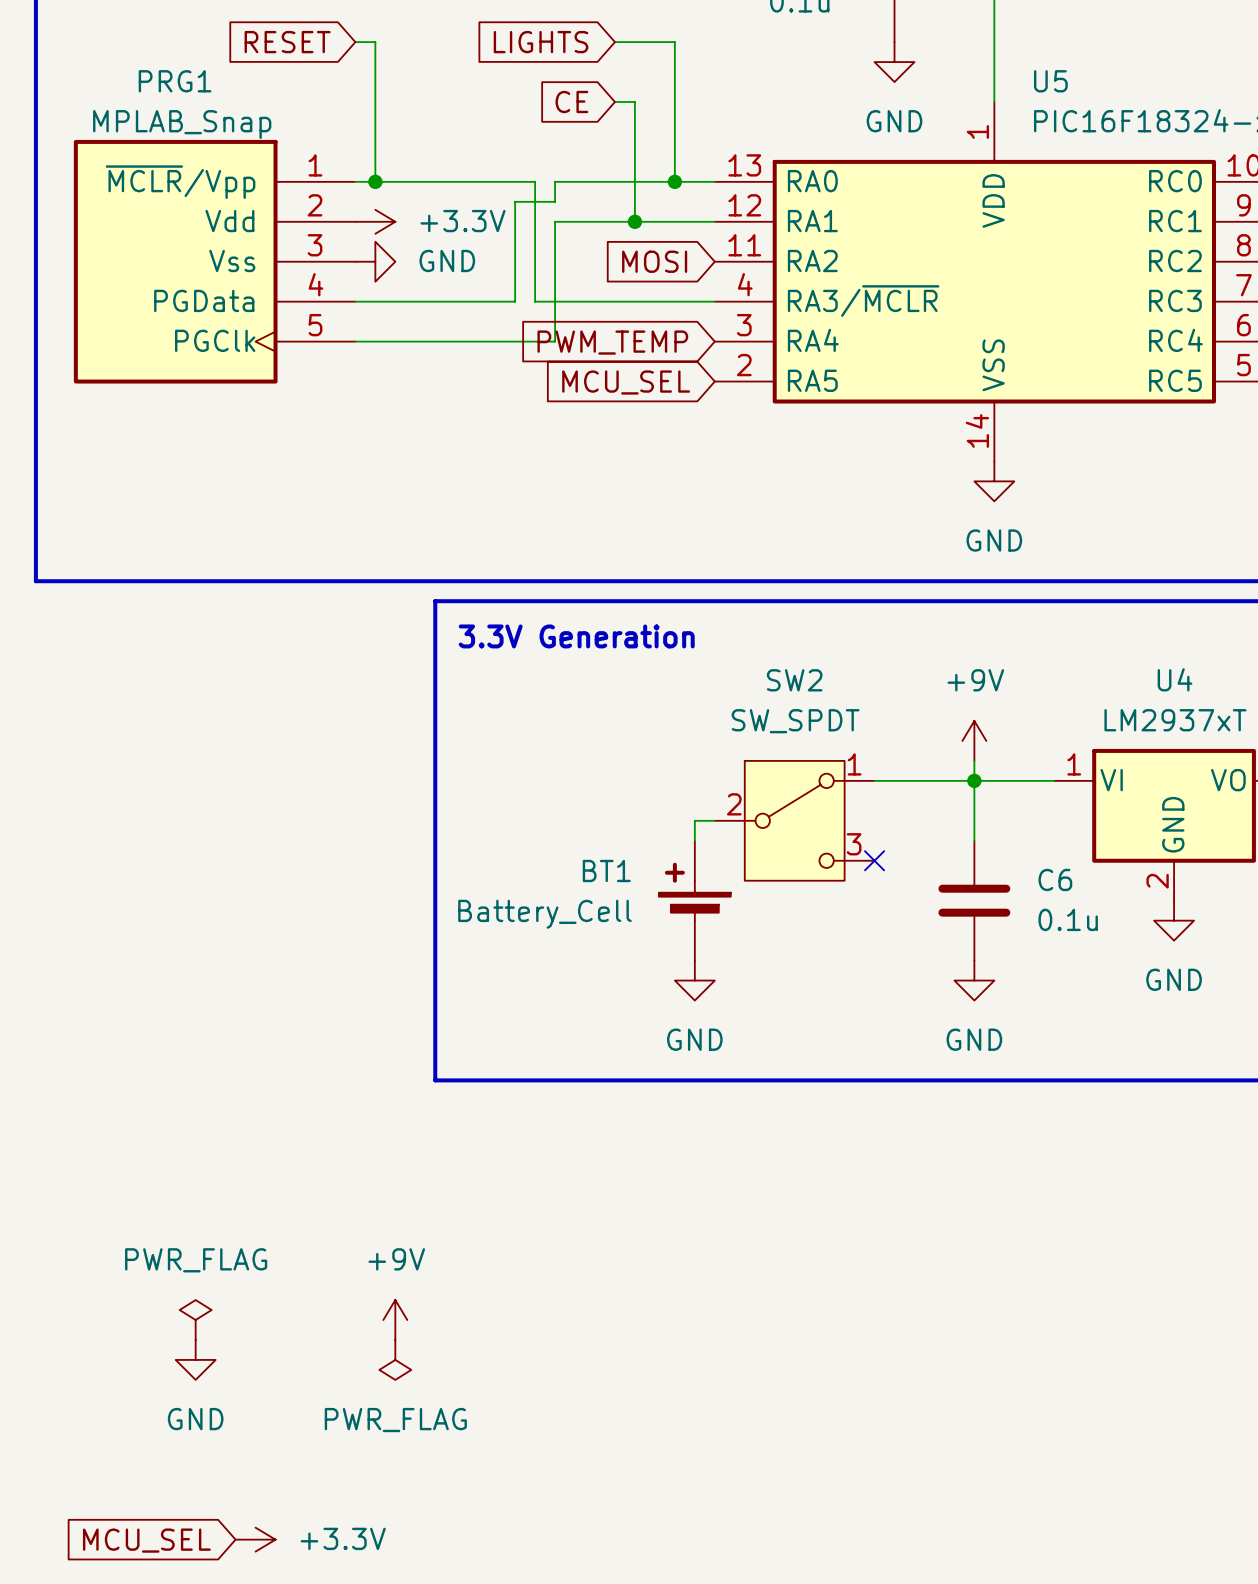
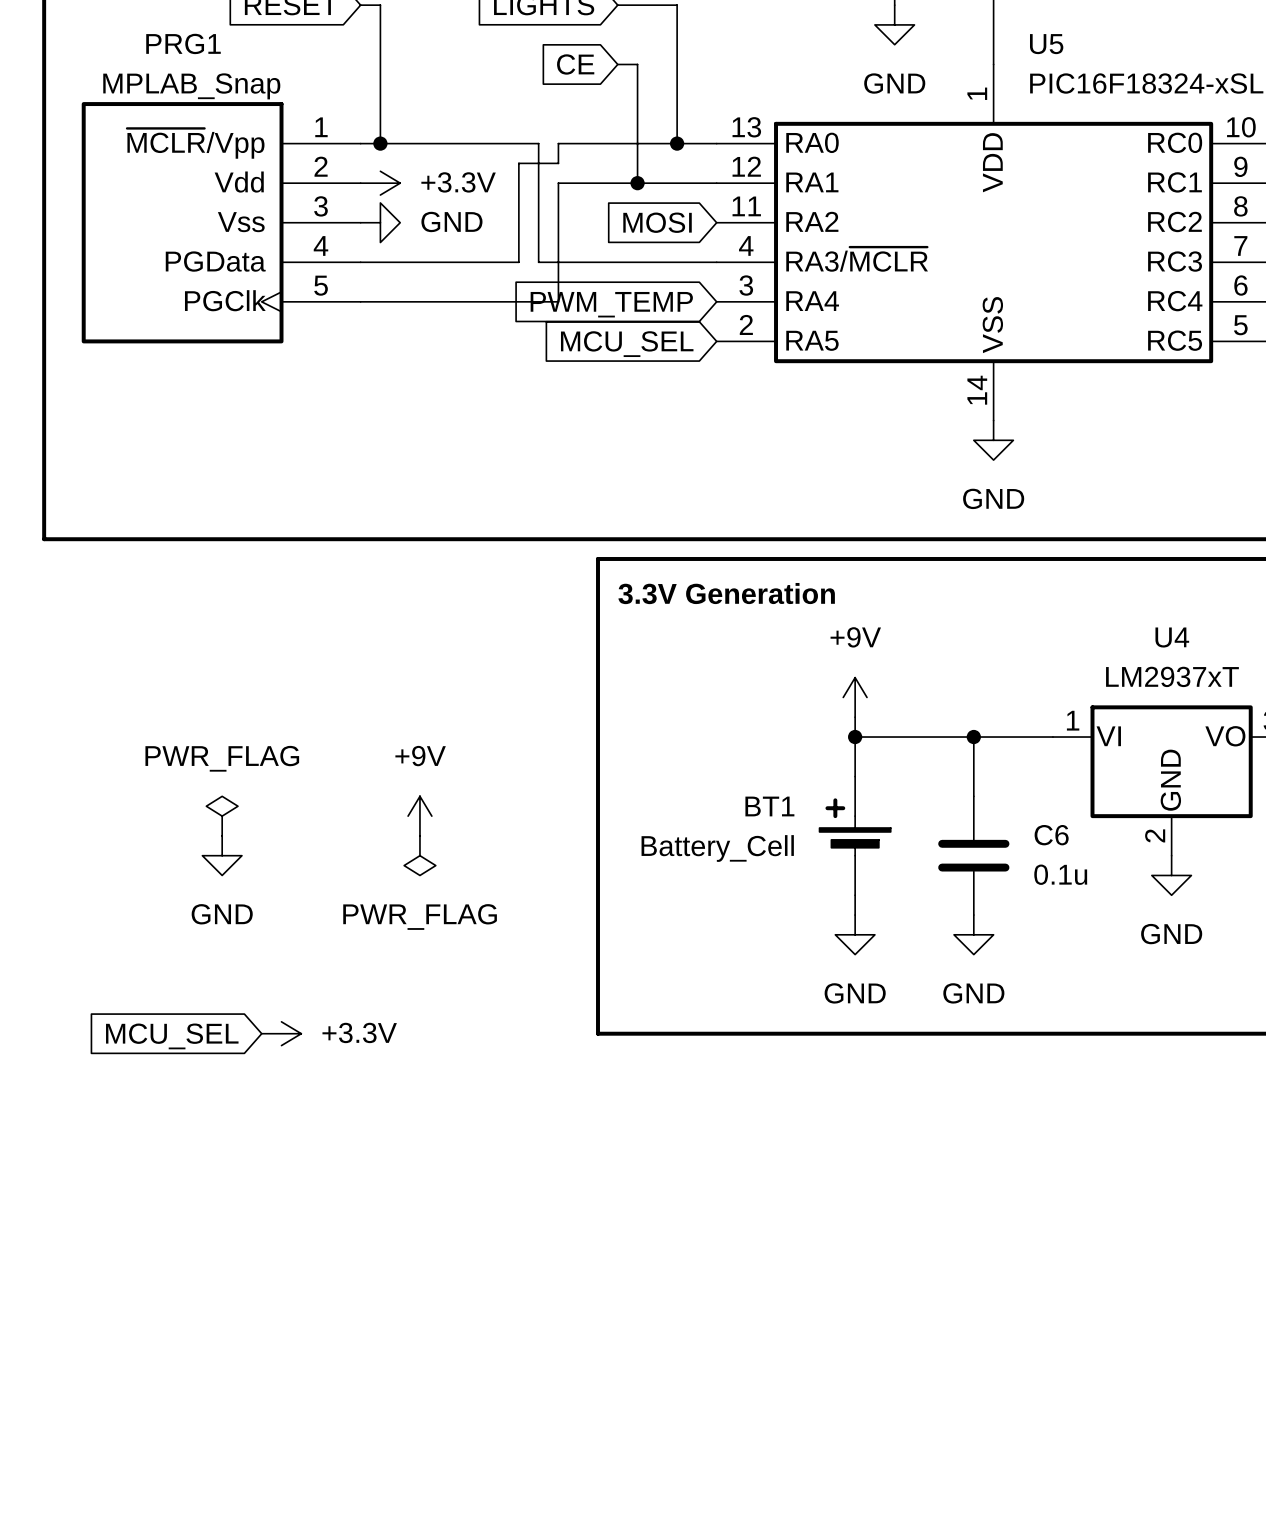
line: (595, 601) (435, 601) (435, 1080) (595, 1080) -> (597, 558) (597, 1033)
text position: 3.3V Generation (576, 636) -> 3.3V Generation (726, 593)
power symbol position: +9V (974, 740) -> +9V (855, 697)
wire: none -> (855, 717) (855, 776)
wire: (974, 760) (974, 780) -> (855, 895) (855, 915)
junction: none -> (855, 737)
wire: (714, 820) (694, 820) (694, 840) -> none
SW2: SW_SPDT (794, 820) -> none
power symbol: none -> PWR_FLAG (222, 816)
power symbol: none -> +9V (419, 816)
no-connect mark: (874, 860) -> none
power symbol: none -> GND (222, 855)
power symbol: none -> PWR_FLAG (419, 855)
BT1 position: (694, 900) -> (855, 835)
power symbol position: GND (694, 980) -> GND (855, 934)
power symbol: none -> +3.3V (281, 1033)
global label: none -> MCU_SEL (172, 1036)
power symbol: PWR_FLAG (195, 1320) -> none
power symbol: +9V (395, 1320) -> none
power symbol: GND (195, 1359) -> none
power symbol: PWR_FLAG (395, 1359) -> none
power symbol: +3.3V (255, 1539) -> none
global label: MCU_SEL (146, 1540) -> none

